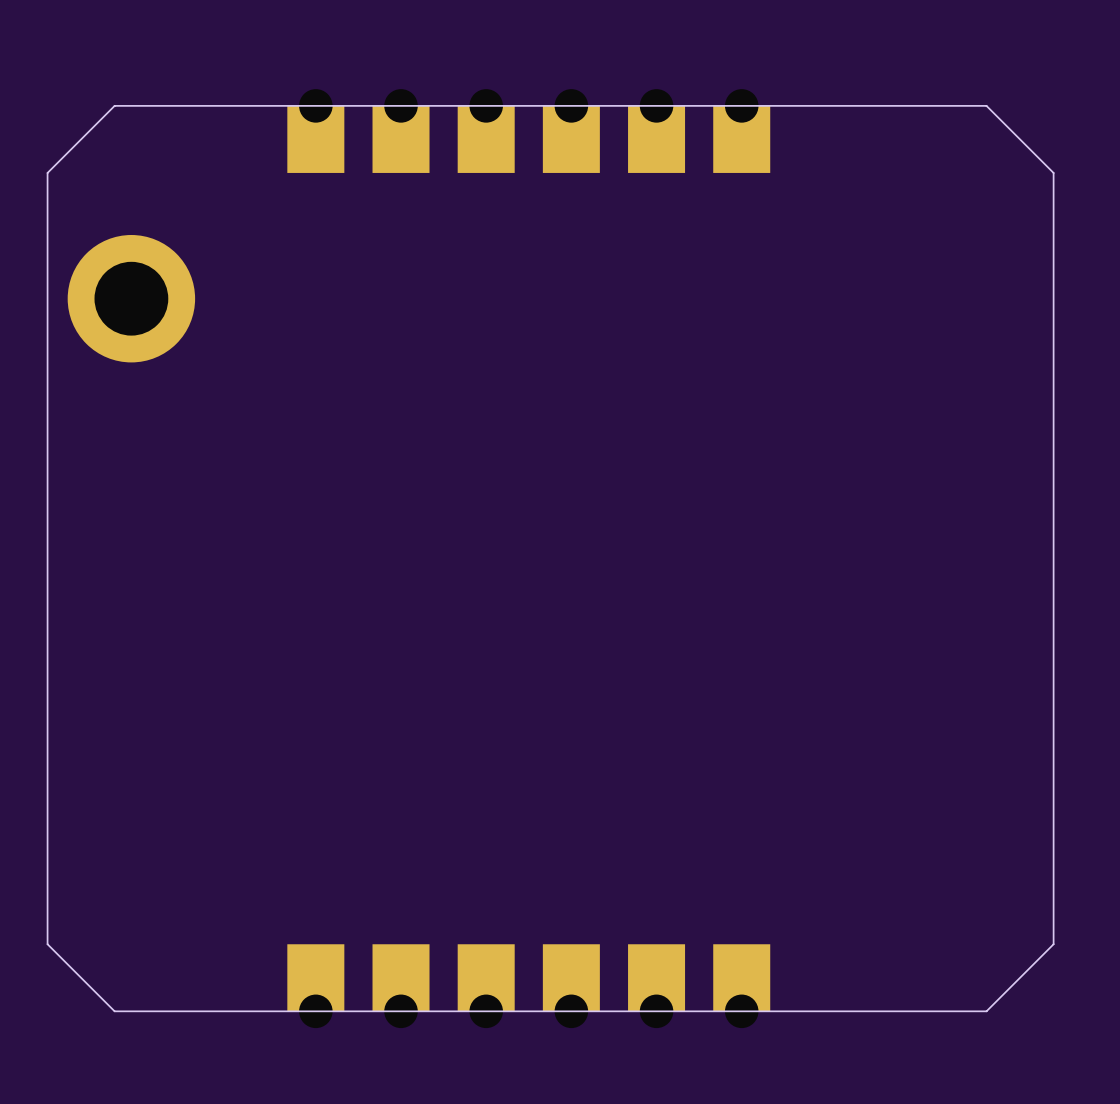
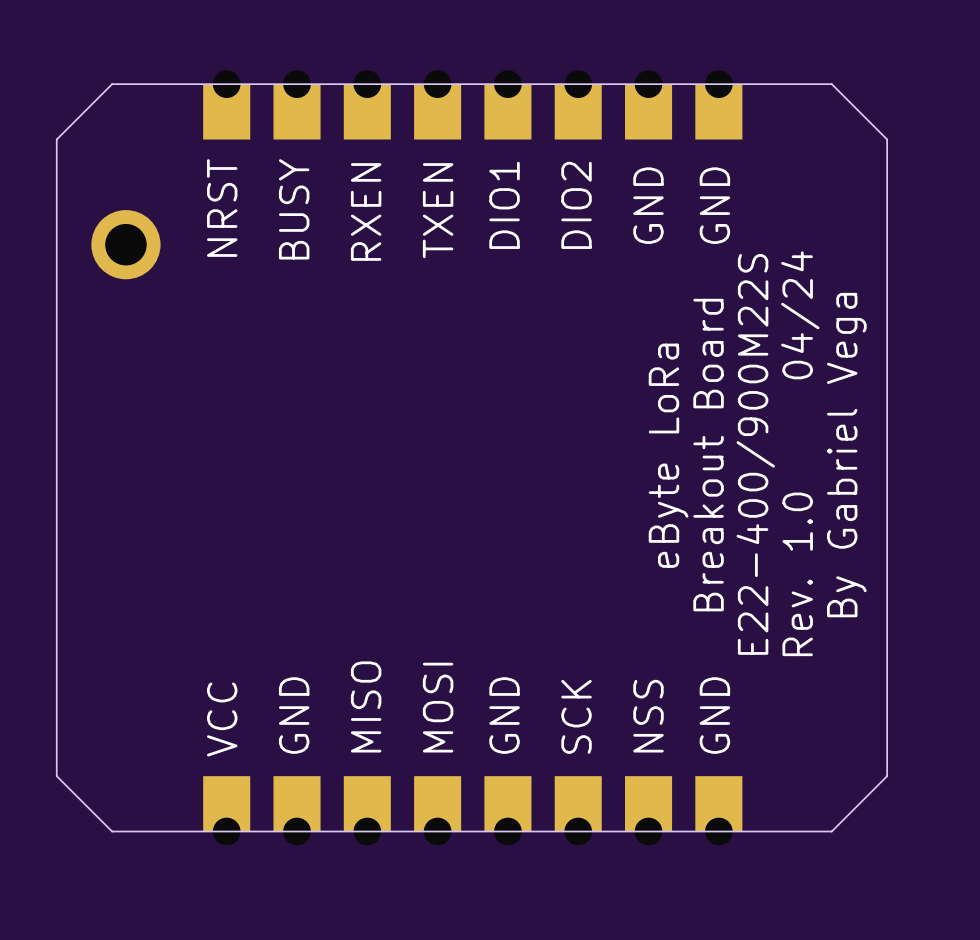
part footprint: [287, 89, 771, 173] -> [203, 70, 743, 140]
part footprint: [67, 234, 196, 363] -> [91, 210, 161, 280]
text: none -> DIO1 (504, 205)
text: none -> DIO2 (576, 205)
text: none -> GND (648, 205)
text: none -> GND (714, 205)
text: none -> NRST (222, 208)
text: none -> BUSY (294, 209)
text: none -> TXEN (438, 210)
text: none -> RXEN (366, 211)
text: none -> Rev. 1.0 04/24 (800, 453)
text: none -> E22-400/900M22S (755, 454)
text: none -> Breakout Board (708, 455)
text: none -> By Gabriel Vega (846, 455)
text: none -> eByte LoRa (668, 455)
text: none -> MISO (366, 706)
text: none -> MOSI (438, 707)
text: none -> GND (294, 715)
text: none -> GND (504, 715)
text: none -> GND (714, 715)
text: none -> NSS (648, 716)
text: none -> SCK (576, 716)
text: none -> VCC (222, 719)
part footprint: [287, 944, 771, 1029] -> [203, 776, 743, 846]

